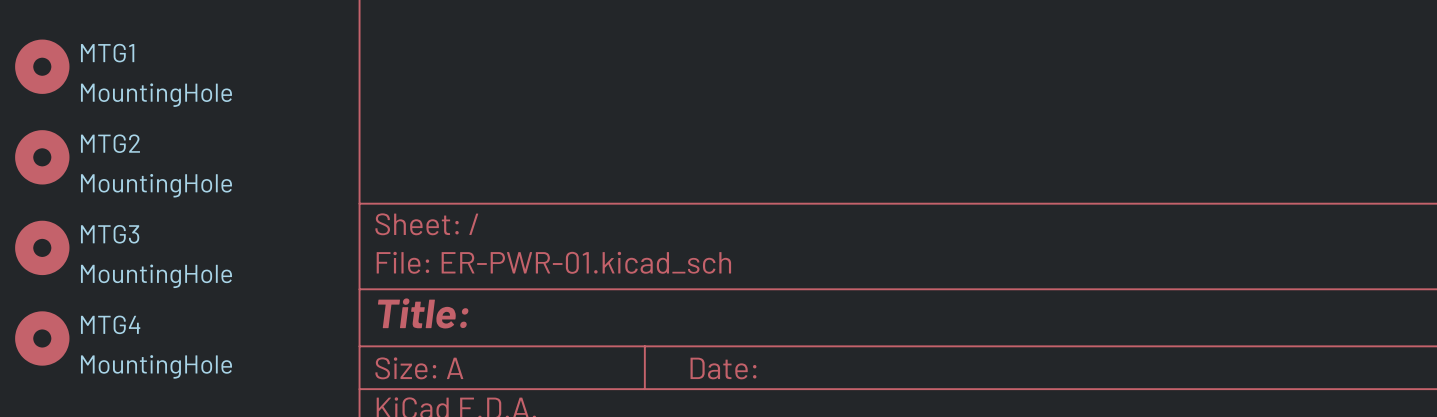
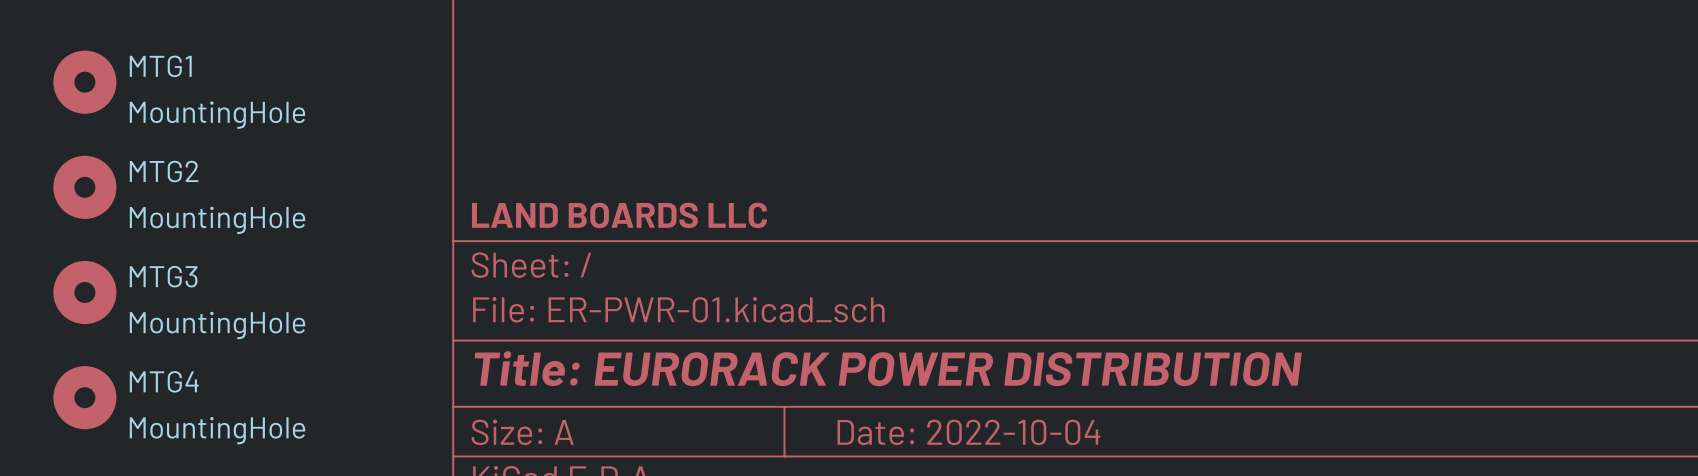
title block: none -> LAND BOARDS LLC (619, 215)
title block: Title: (423, 313) -> Title: EURORACK POWER DISTRIBUTION (888, 368)
title block: Date: (723, 368) -> Date: 2022-10-04 (968, 432)

